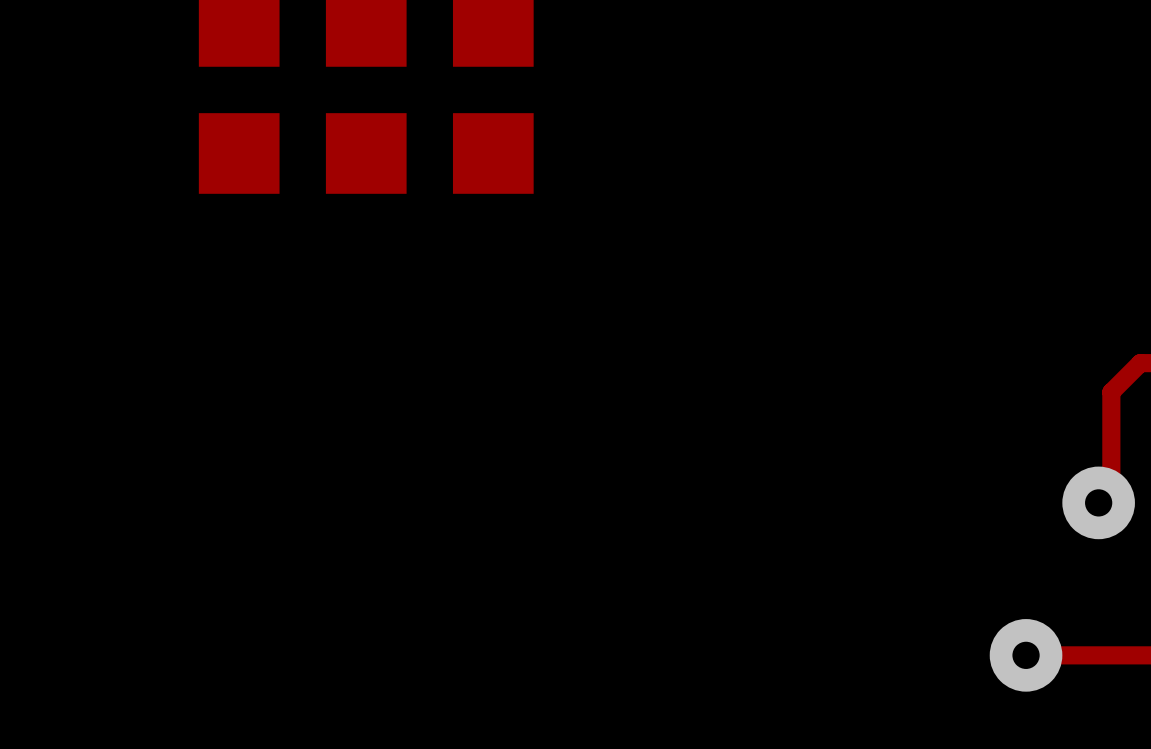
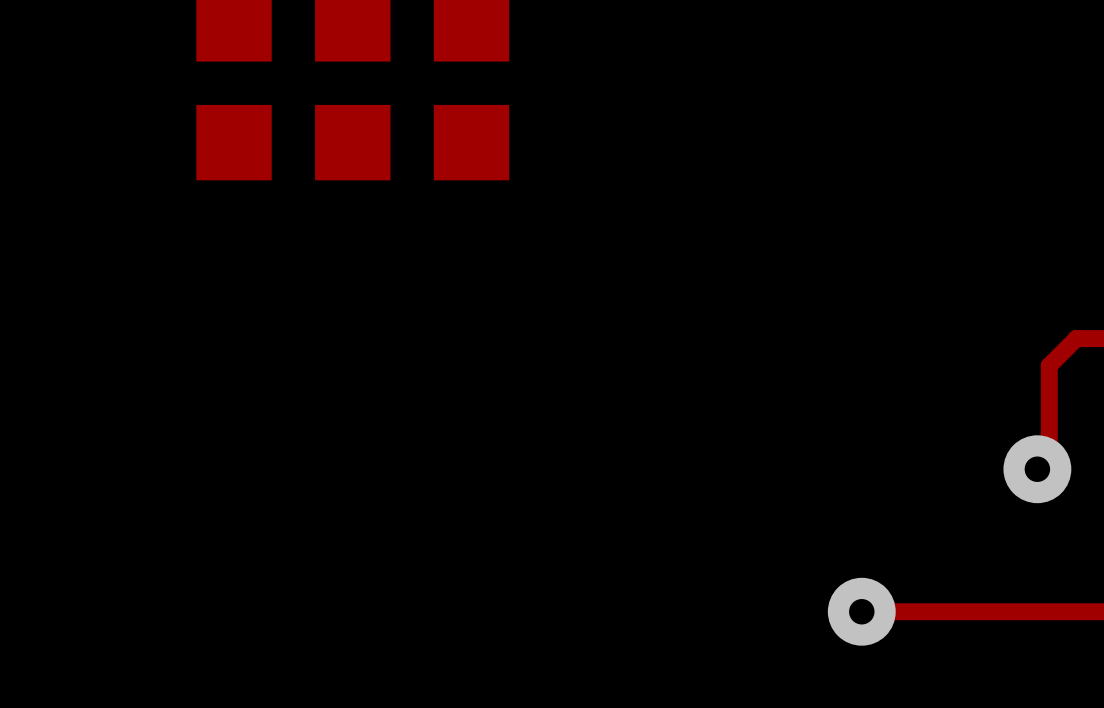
track: none -> (861, 611) (969, 611)
via position: (1026, 655) -> (861, 611)

